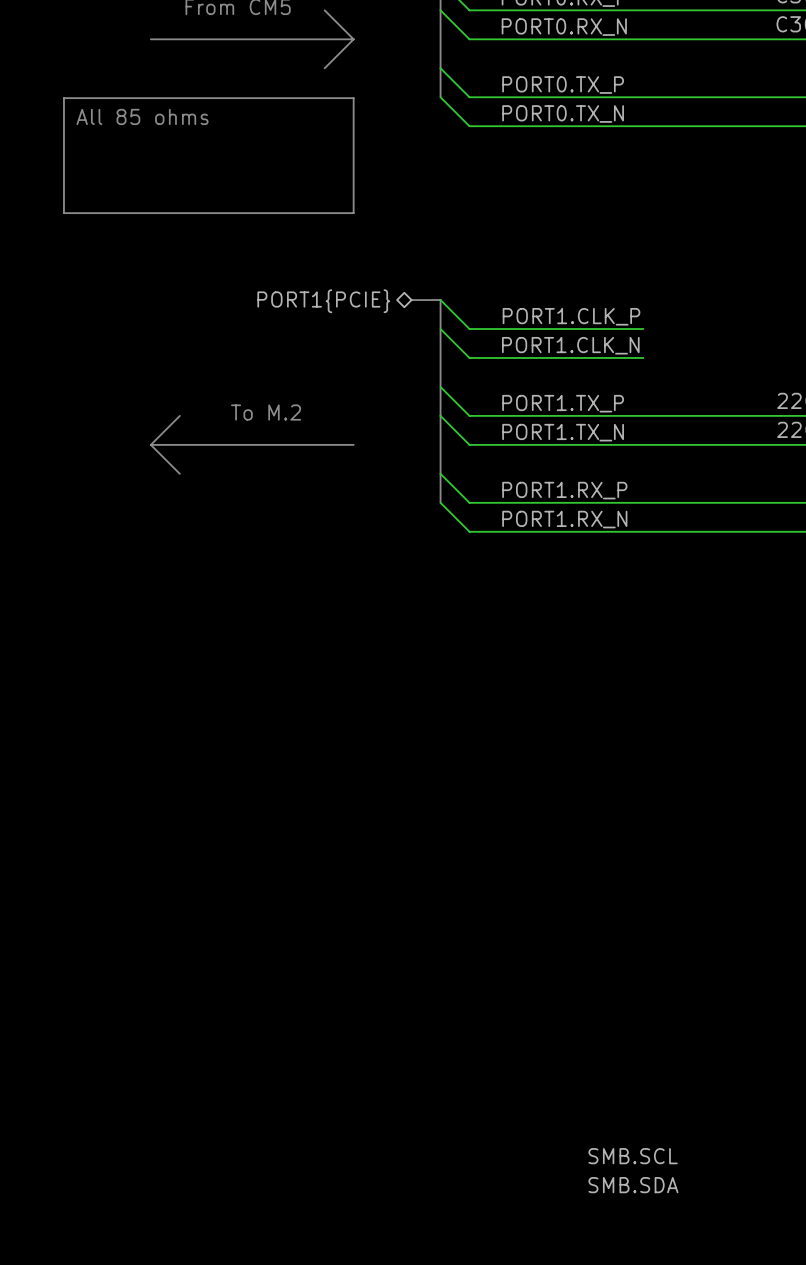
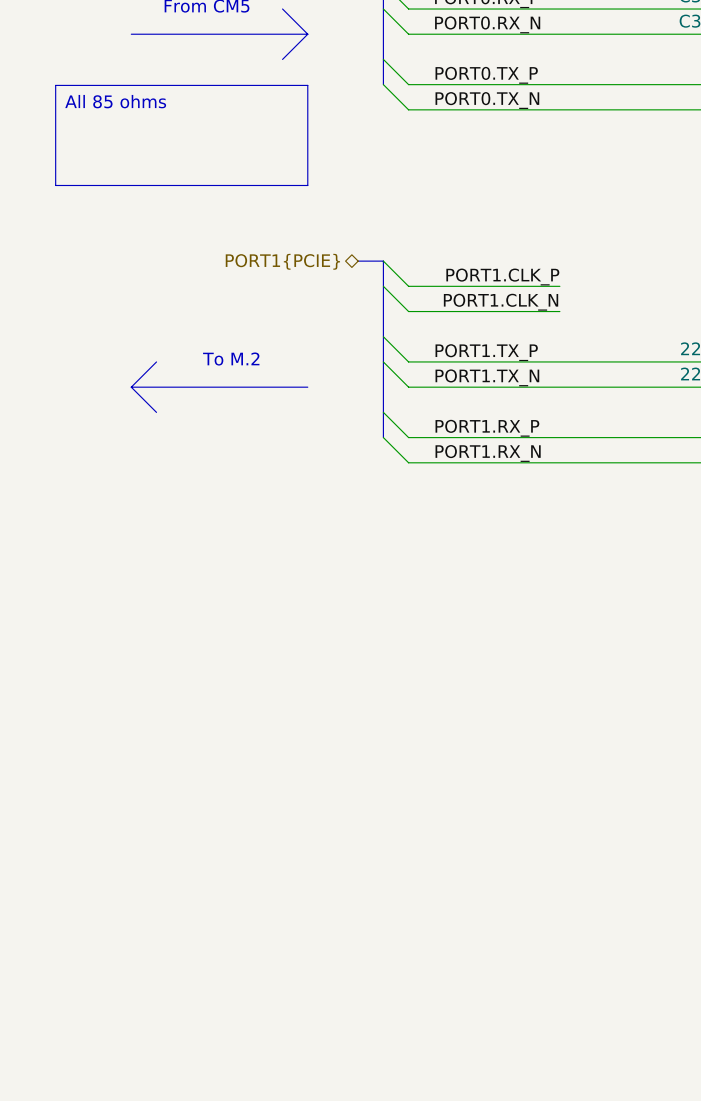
label: SMB.SCL (633, 1156) -> none
label: SMB.SDA (633, 1185) -> none

